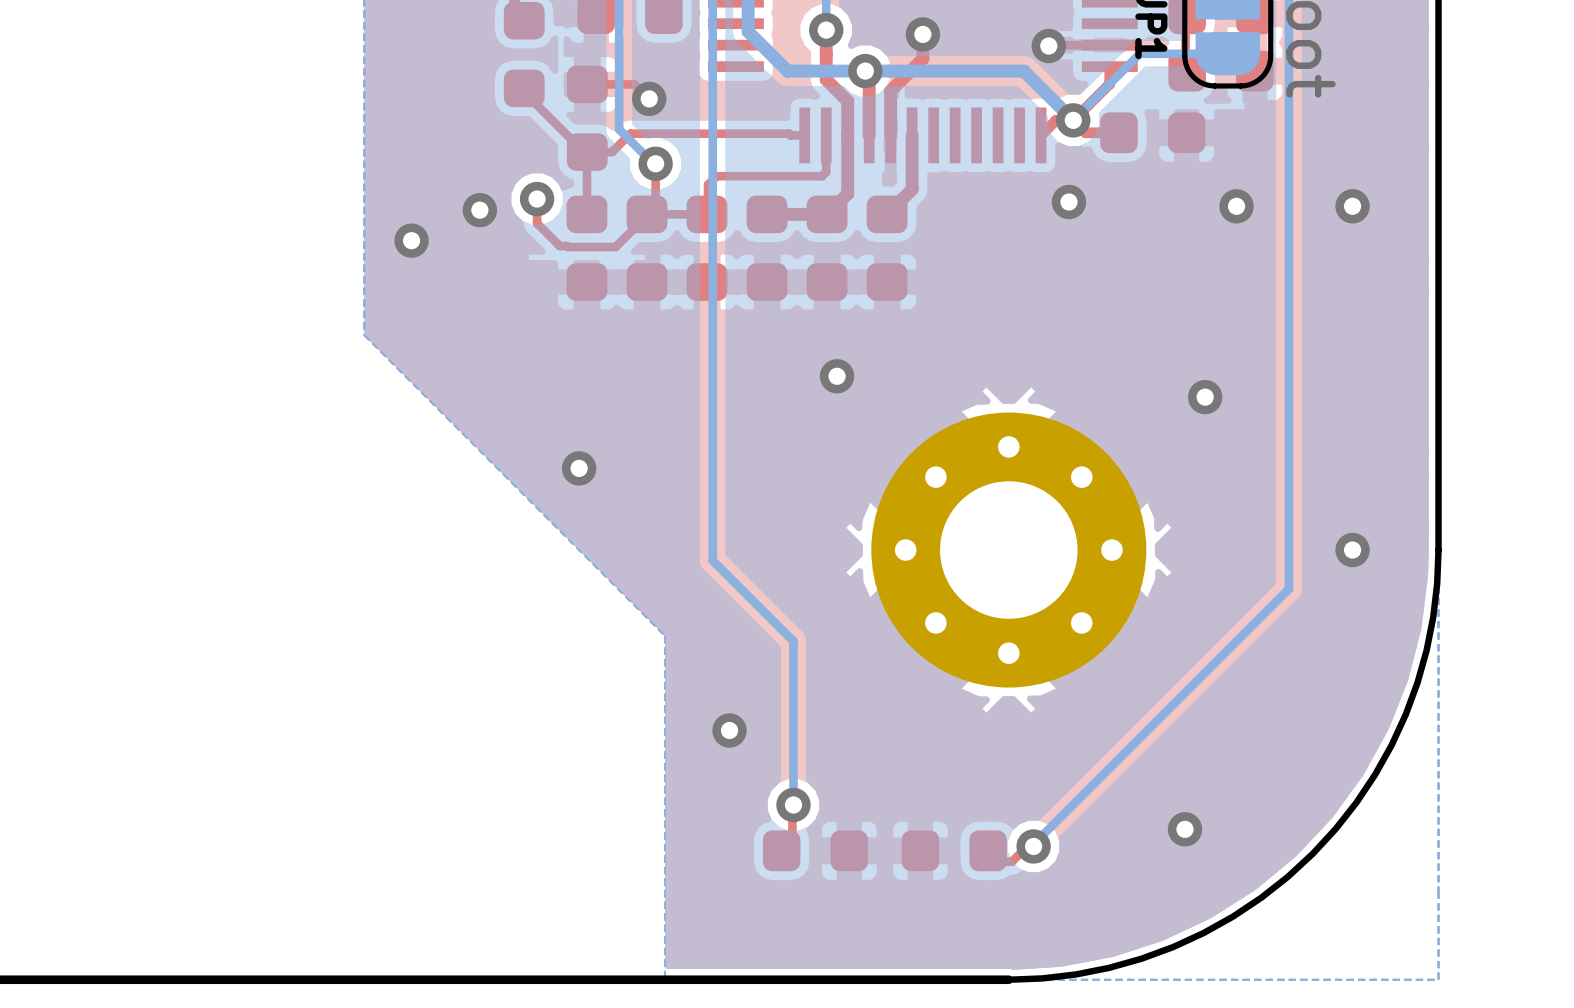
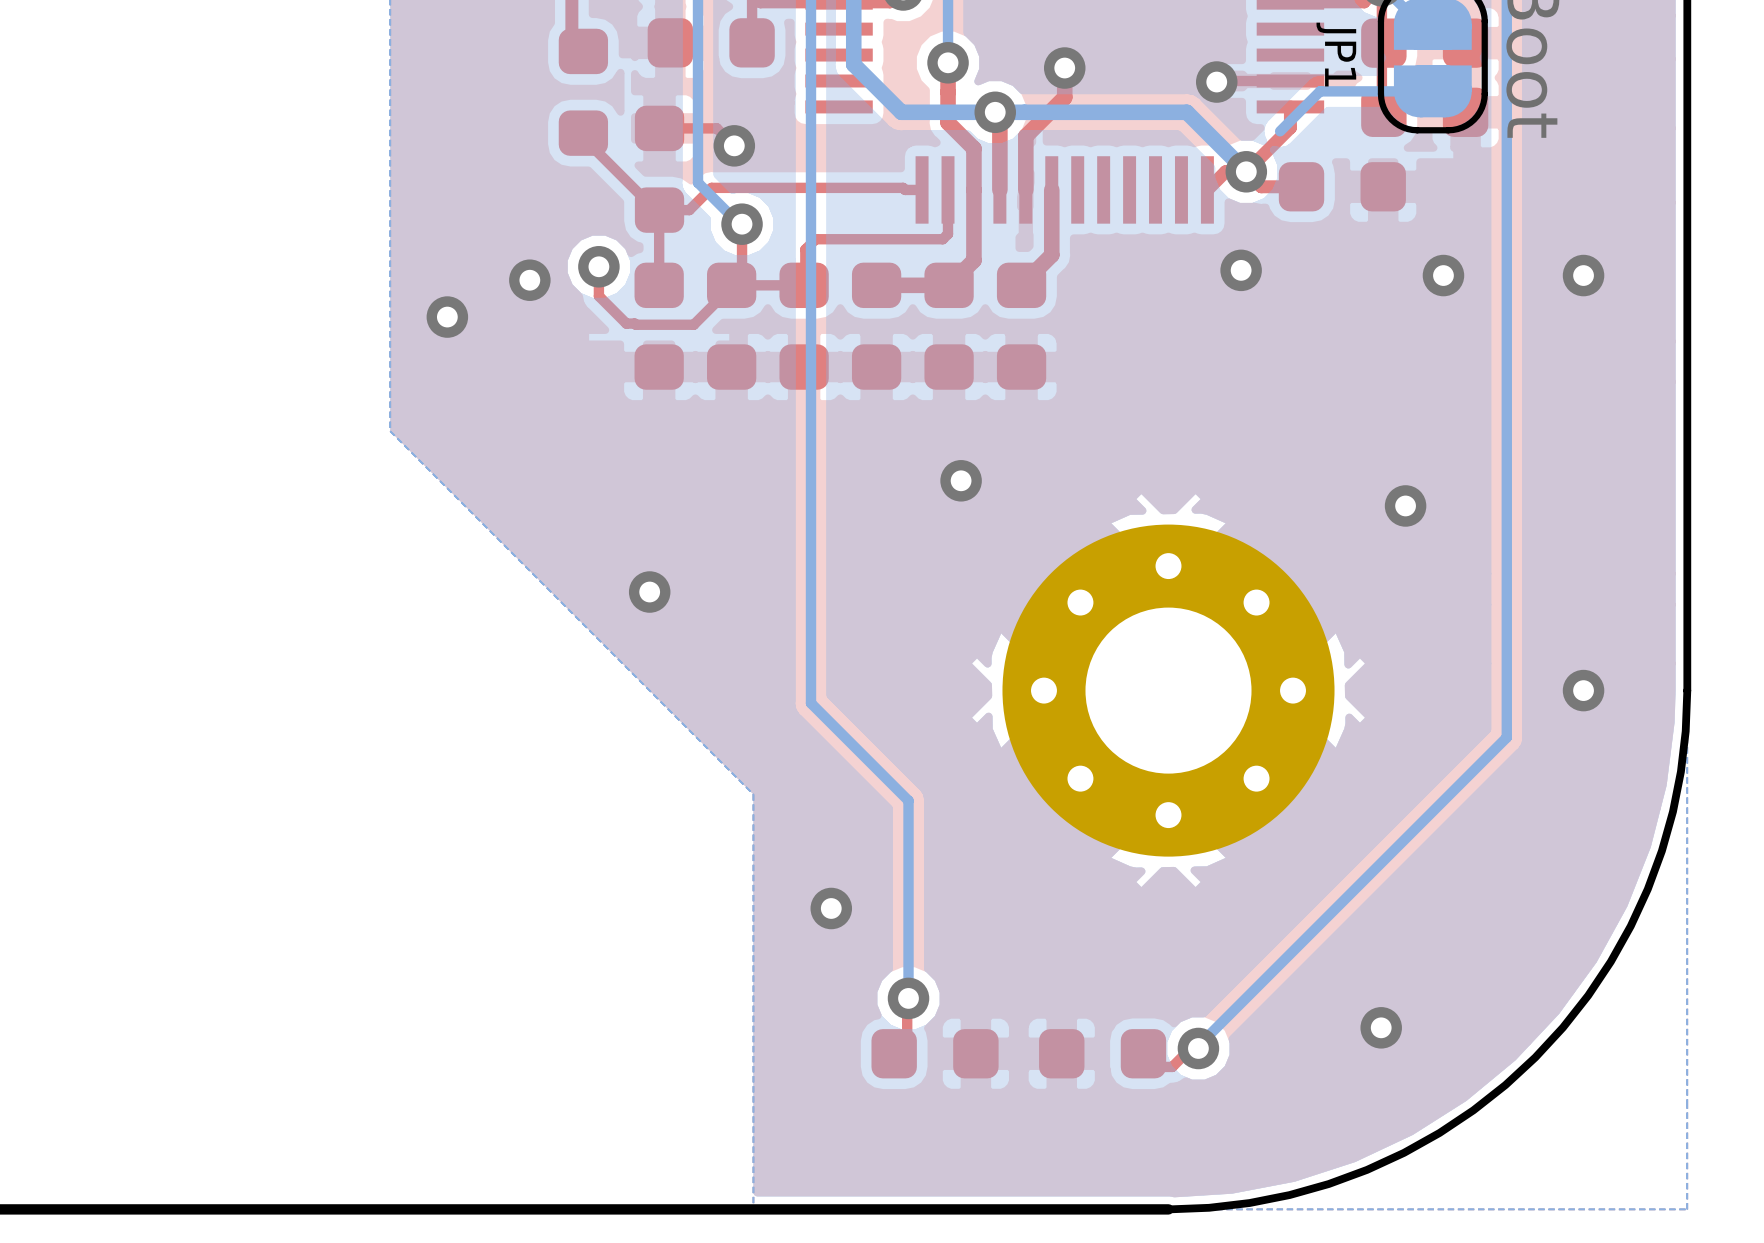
bottom track: (1139, 53) (1073, 120) -> (1326, 91) (1320, 91) (1280, 131)

